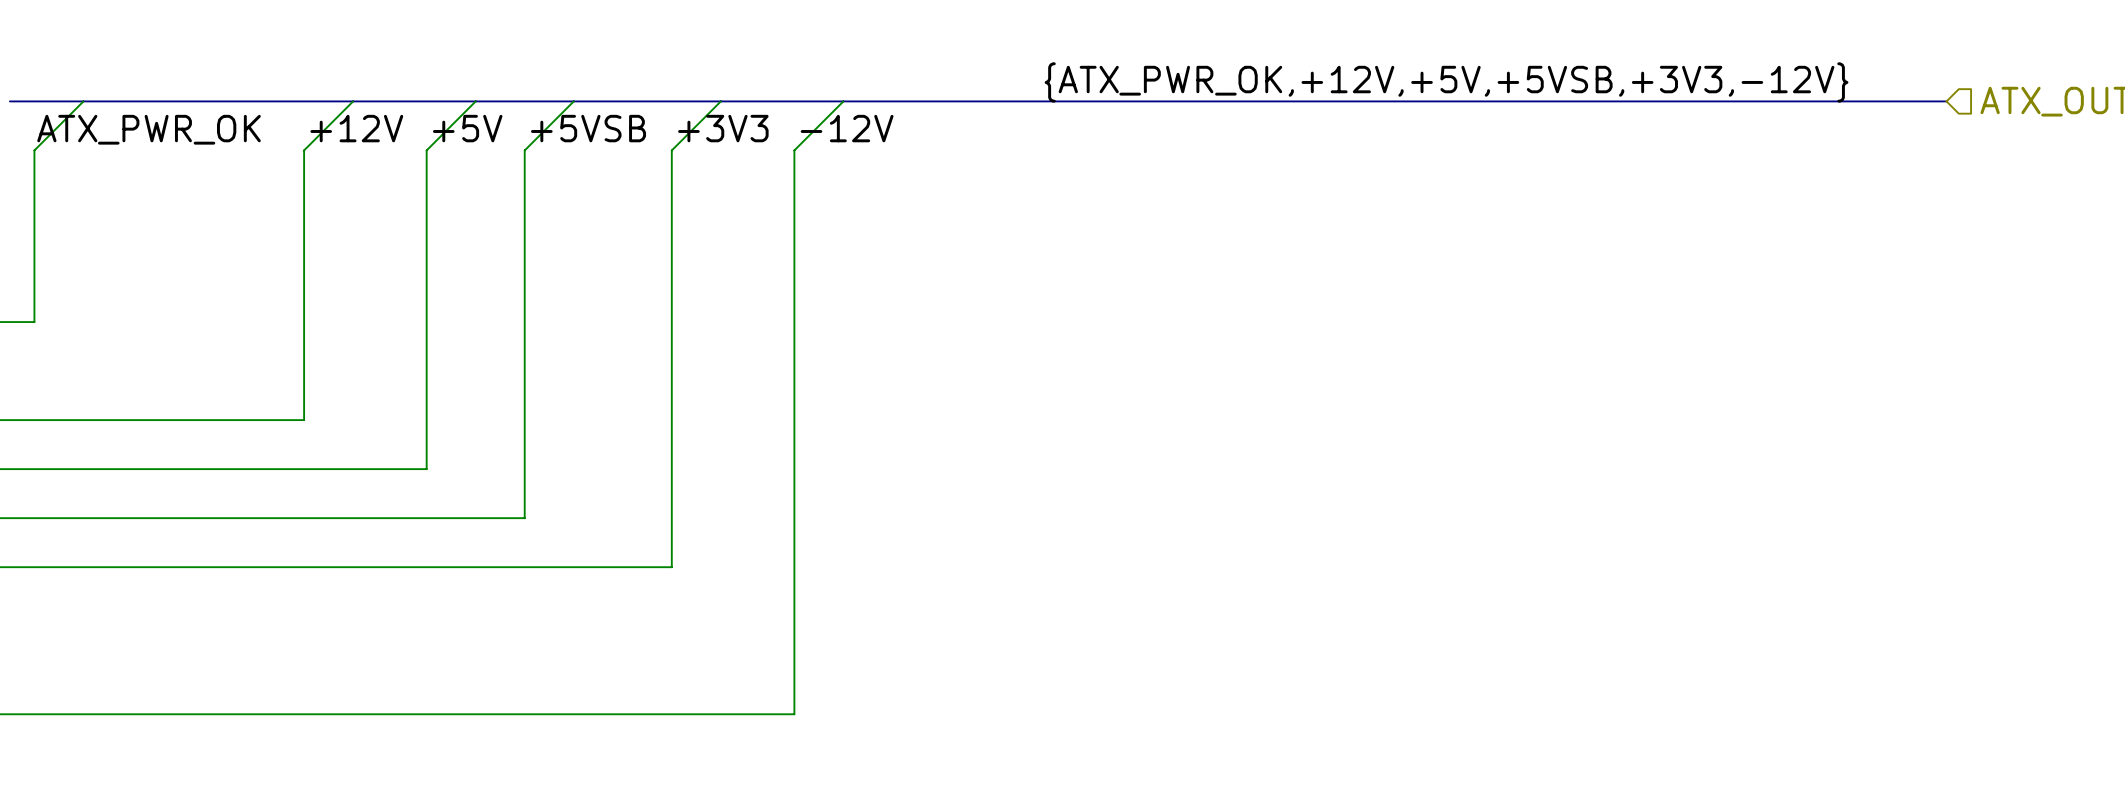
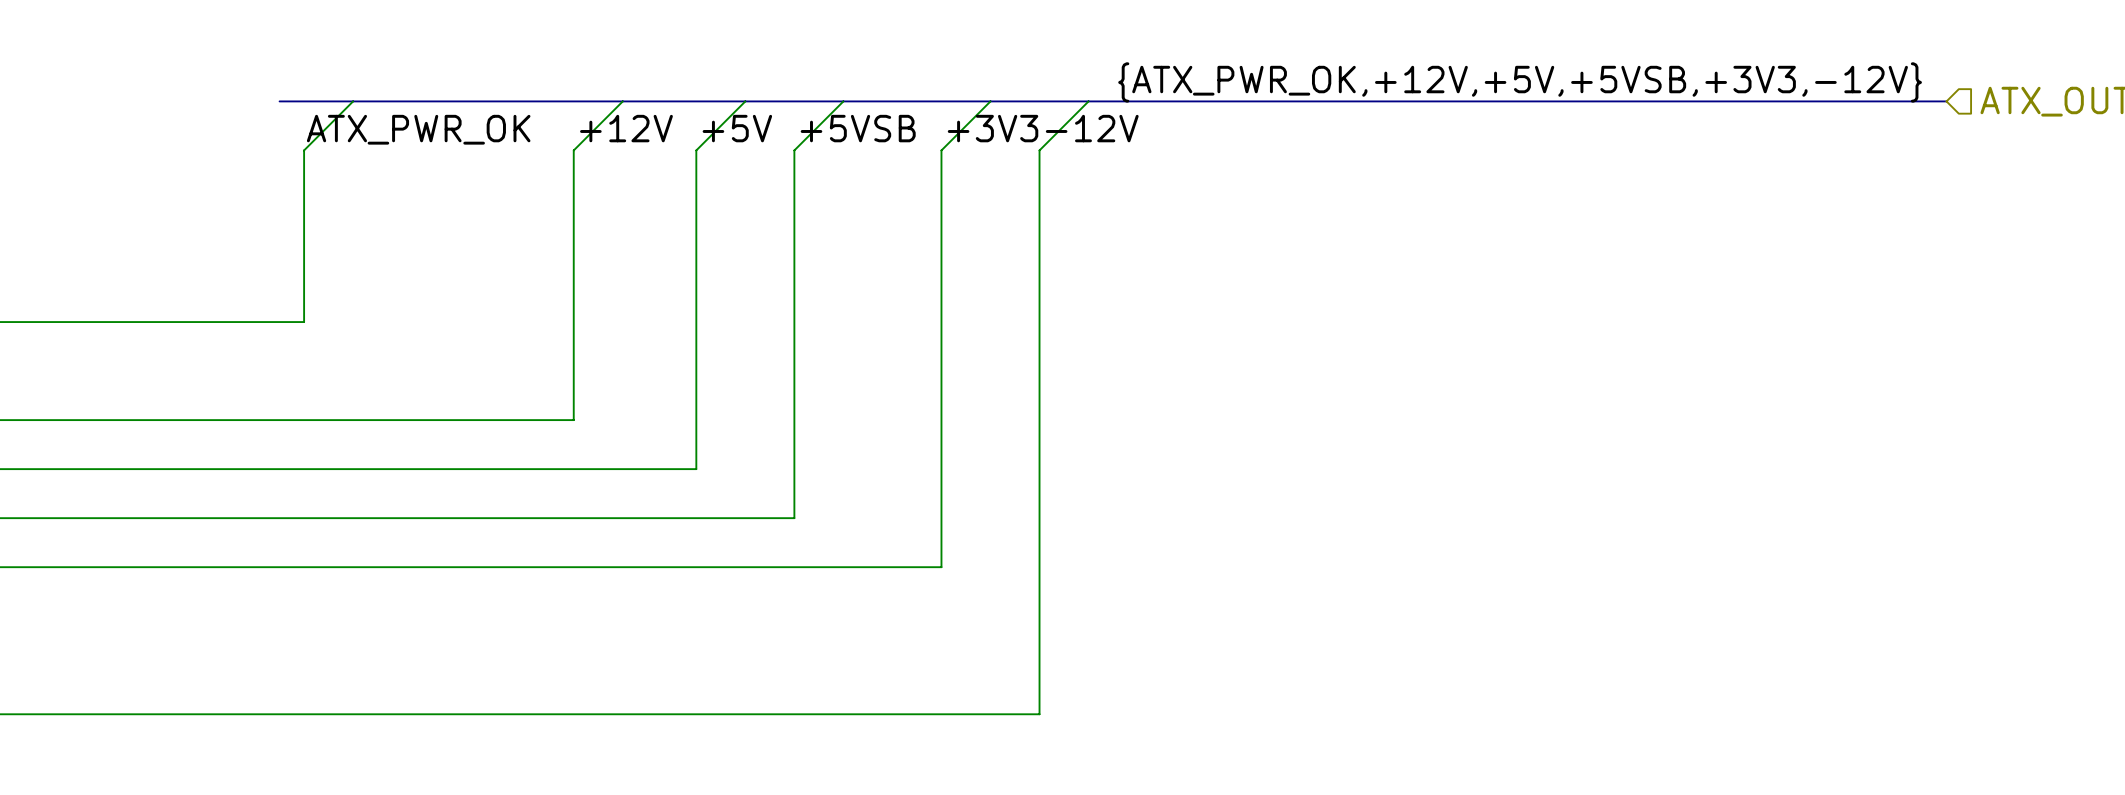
label position: {ATX_PWR_OK,+12V,+5V,+5VSB,+3V3,-12V} (1446, 82) -> {ATX_PWR_OK,+12V,+5V,+5VSB,+3V3,-12V} (1520, 82)
bus: (9, 101) (279, 101) -> none
wire: (83, 101) (34, 150) (34, 322) -> none
wire: (475, 101) (426, 150) (426, 469) -> (745, 101) (696, 150) (696, 469) (426, 469)
wire: (573, 101) (524, 150) (524, 518) -> none
wire: none -> (622, 101) (573, 150) (573, 420) (304, 420)
wire: (720, 101) (671, 150) (671, 567) -> (990, 101) (941, 150) (941, 567) (671, 567)
wire: none -> (1088, 101) (1039, 150) (1039, 714) (794, 714)
label: +12V (356, 128) -> ATX_PWR_OK (418, 129)
label position: +5V (467, 128) -> +5V (737, 128)
label: +5VSB (588, 128) -> none
label: none -> +12V (626, 128)
label position: +3V3 (723, 128) -> +3V3 (993, 128)
label: -12V (847, 128) -> +5VSB (858, 128)
label: none -> -12V (1092, 128)
label: ATX_PWR_OK (149, 129) -> none
wire: (304, 322) (304, 420) -> (304, 322) (34, 322)
wire: (794, 518) (794, 714) -> (794, 518) (524, 518)

